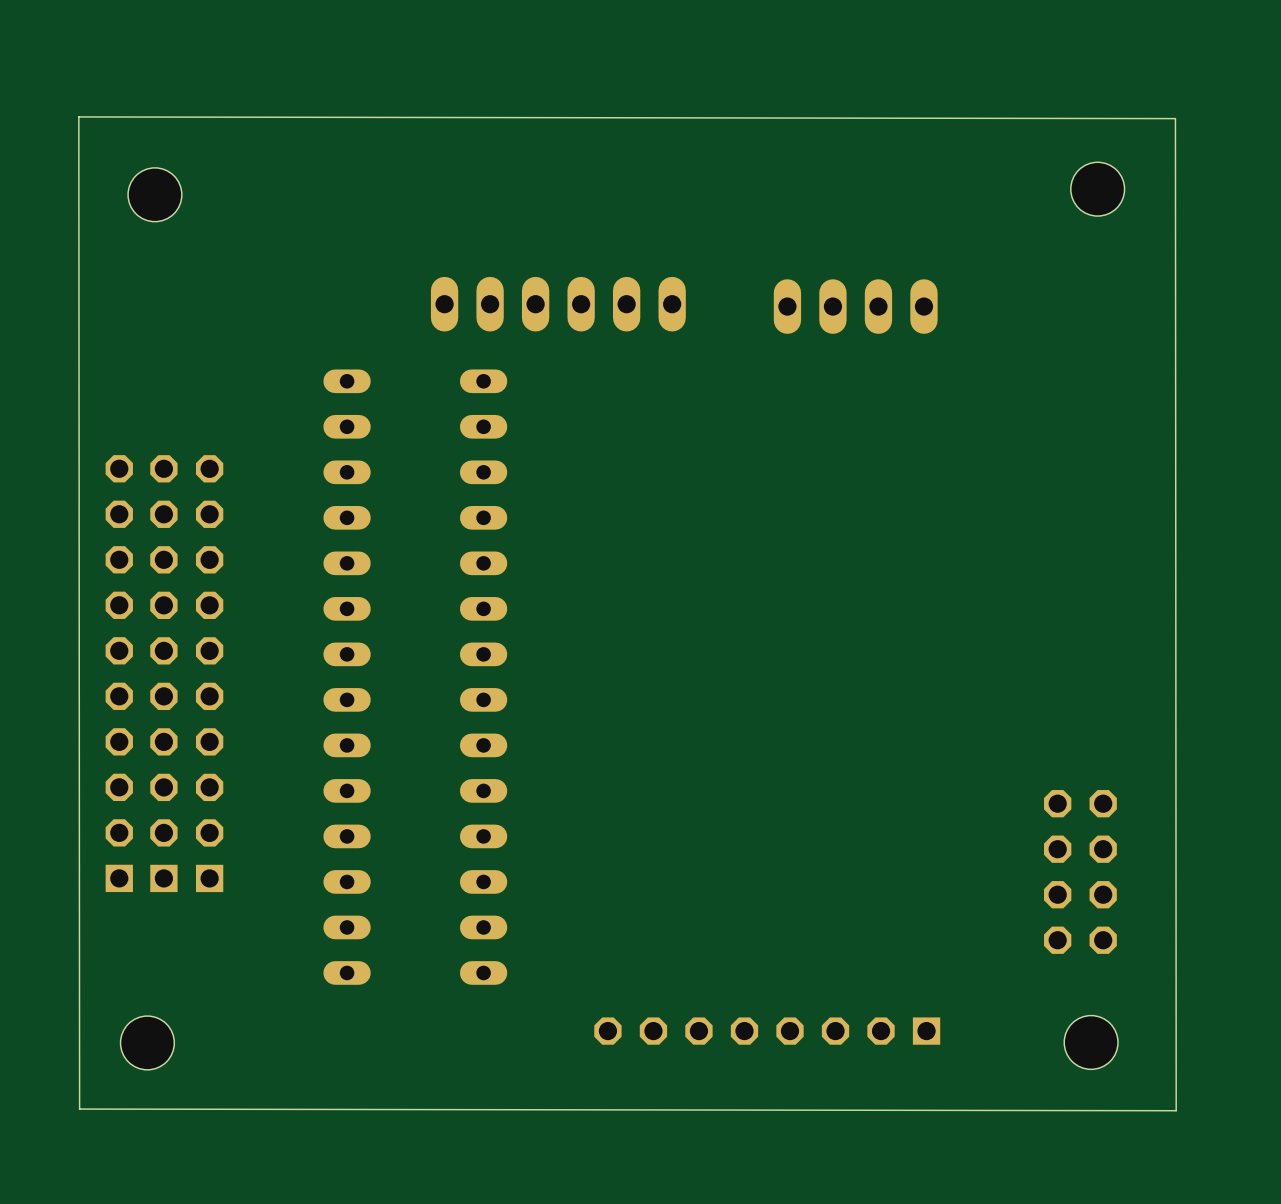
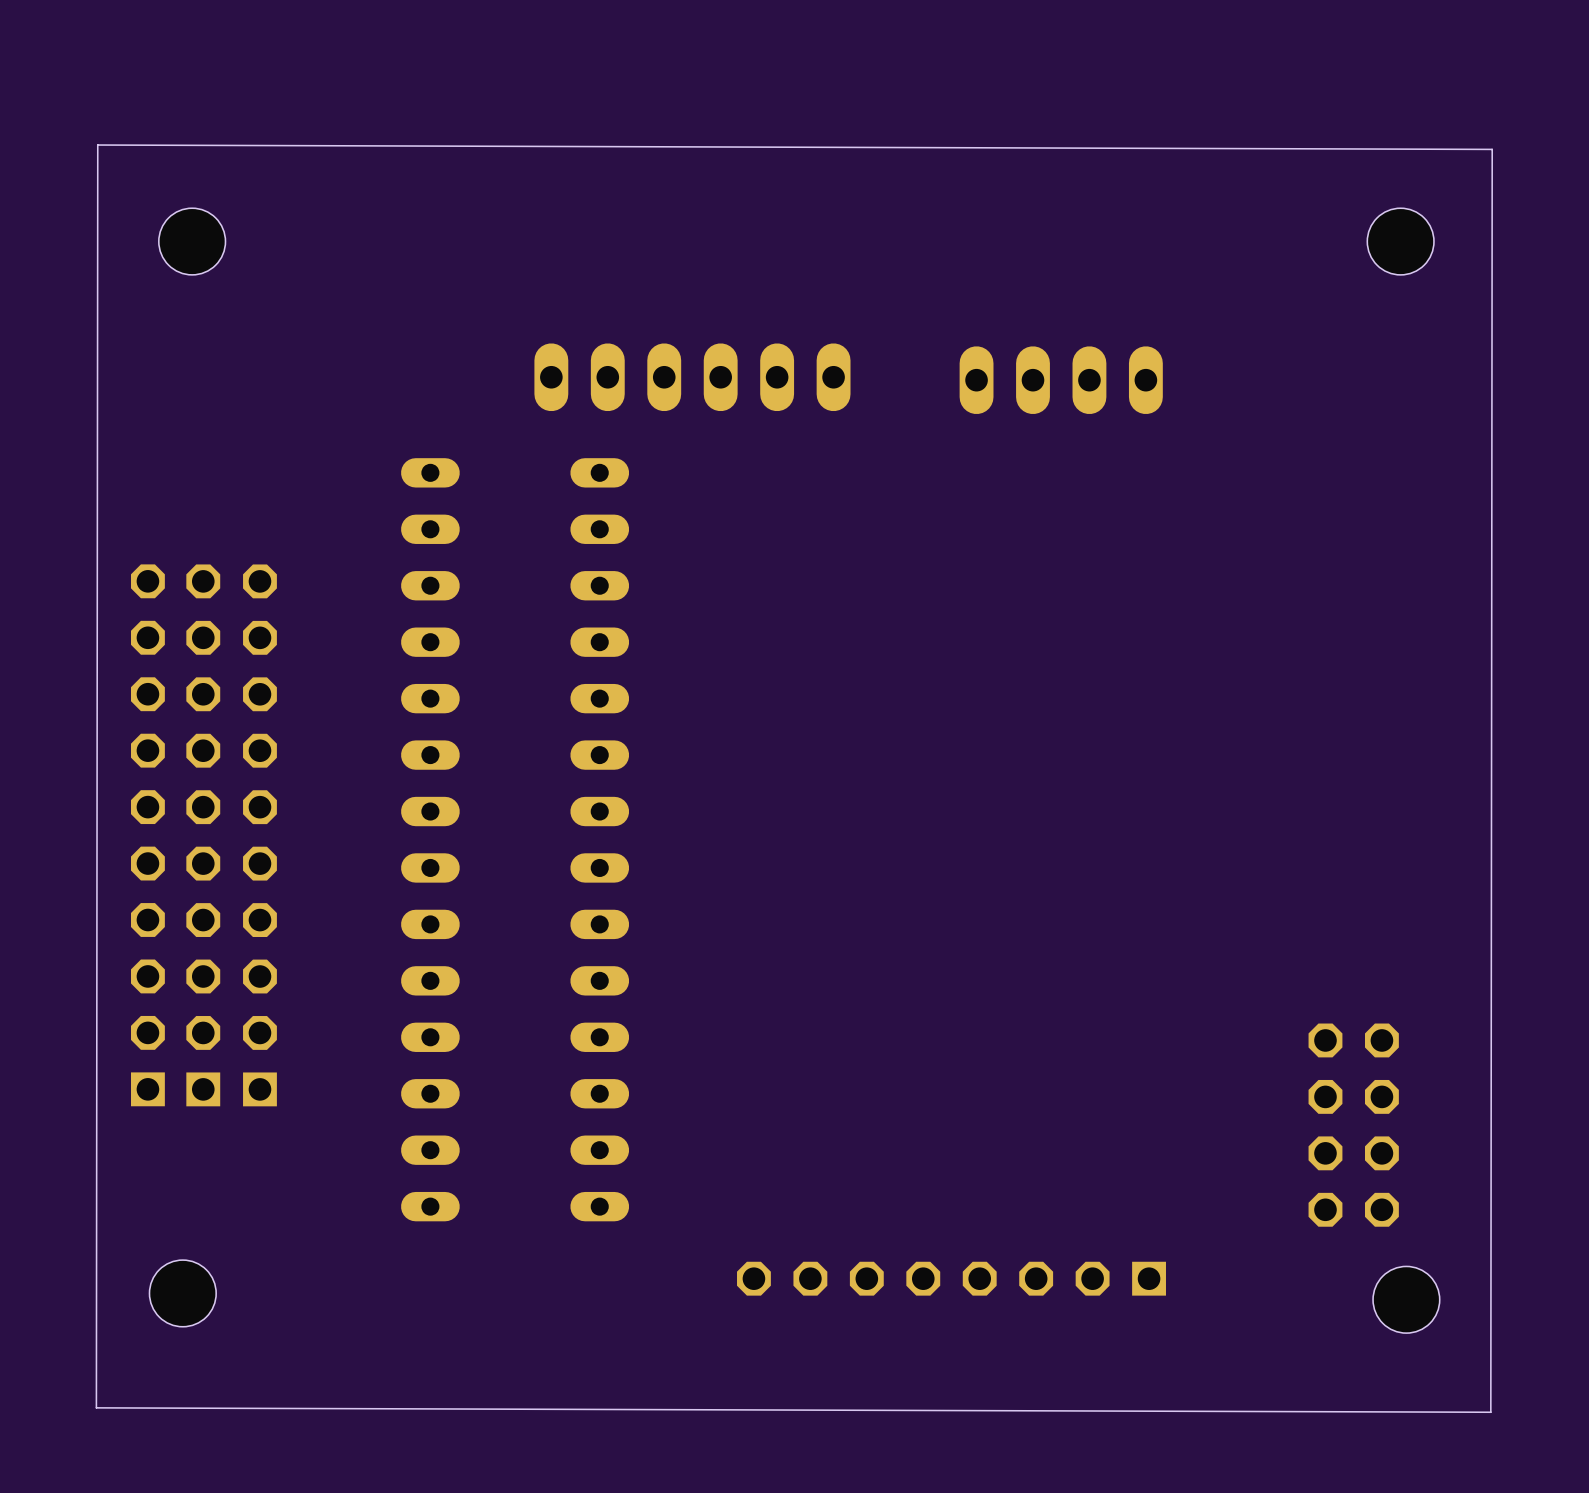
board edge: (78, 116) (79, 1109) (1176, 1110) (1175, 118) (78, 116) -> (97, 145) (1492, 149) (1490, 1412) (96, 1407) (97, 145)
hole position: (1097, 189) -> (1400, 241)
part position: (1080, 871) -> (1353, 1125)
hole position: (1091, 1042) -> (1406, 1299)

